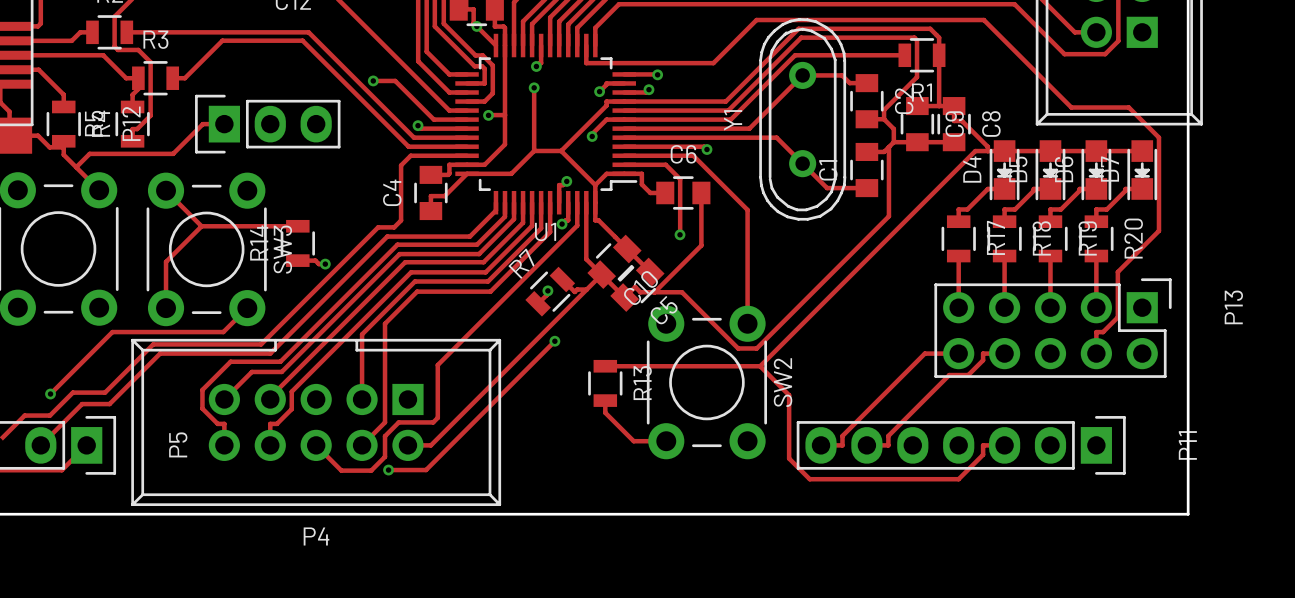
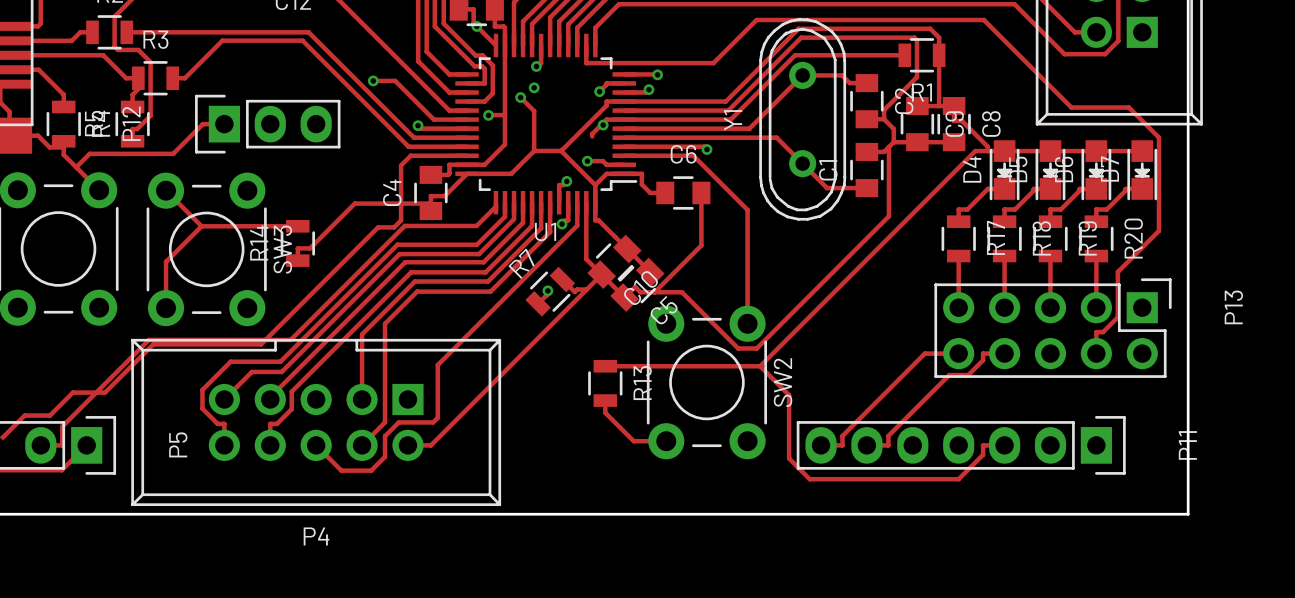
track: (534, 87) (534, 111) -> (520, 97) (534, 111)
via: none -> (520, 97)
via: none -> (603, 125)
via: (592, 136) -> none
via: none -> (587, 161)
track: (624, 164) (665, 164) (680, 179) (680, 234) -> (624, 164) (606, 164) (603, 161) (587, 161)
track: (495, 210) (469, 236) (387, 236) (270, 353) (160, 353) (109, 404) (82, 404) (40, 445) -> (495, 206) (476, 225) (404, 225) (290, 339) (148, 339) (62, 426) (62, 445) (40, 445)
via: (680, 234) -> none
track: (297, 260) (315, 260) (318, 264) (325, 264) -> (297, 260) (297, 248) (310, 248) (354, 203) (430, 203)
via: (325, 264) -> none
track: (247, 308) (223, 332) (112, 332) (50, 394) -> none
track: (554, 341) (426, 470) (388, 470) -> none
via: (554, 341) -> none
via: (50, 394) -> none
via: (388, 470) -> none

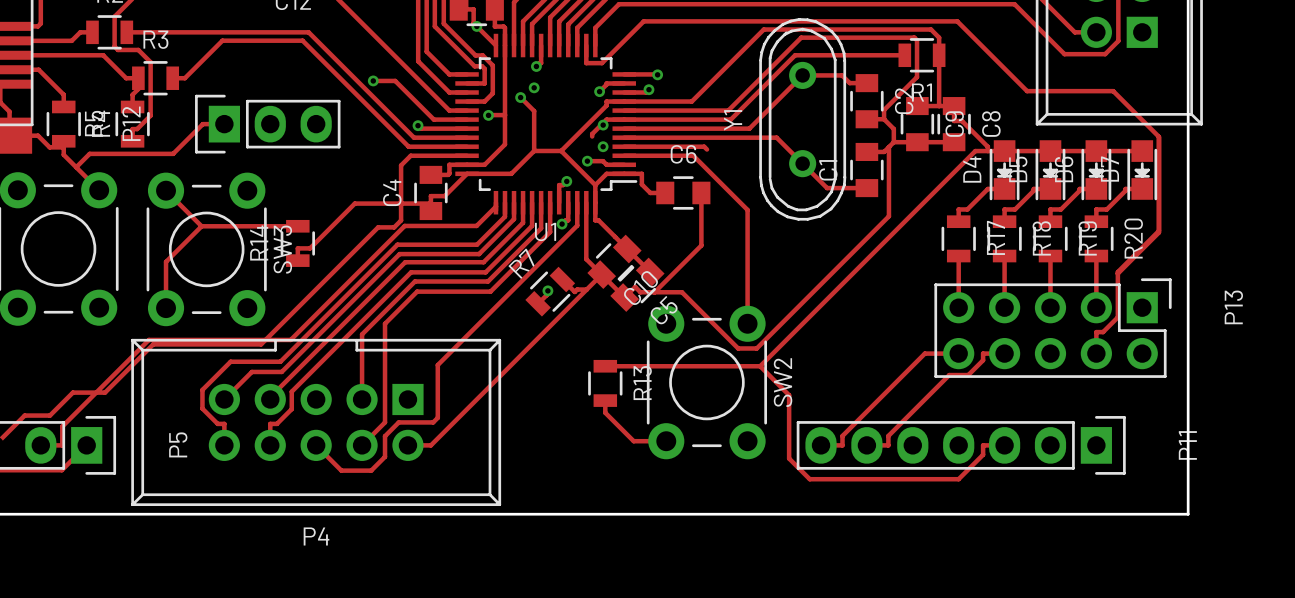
track: (939, 37) (930, 28) (798, 28) (725, 101) (691, 101) -> (939, 37) (931, 29) (763, 29) (691, 101)
track: (601, 63) (713, 63) (756, 20) (983, 20) (1071, 107) (1128, 107) (1158, 137) -> (601, 63) (643, 21) (957, 21) (1027, 91) (1113, 91) (1158, 136) (1158, 232) (1117, 273)
via position: (706, 149) -> (603, 146)

